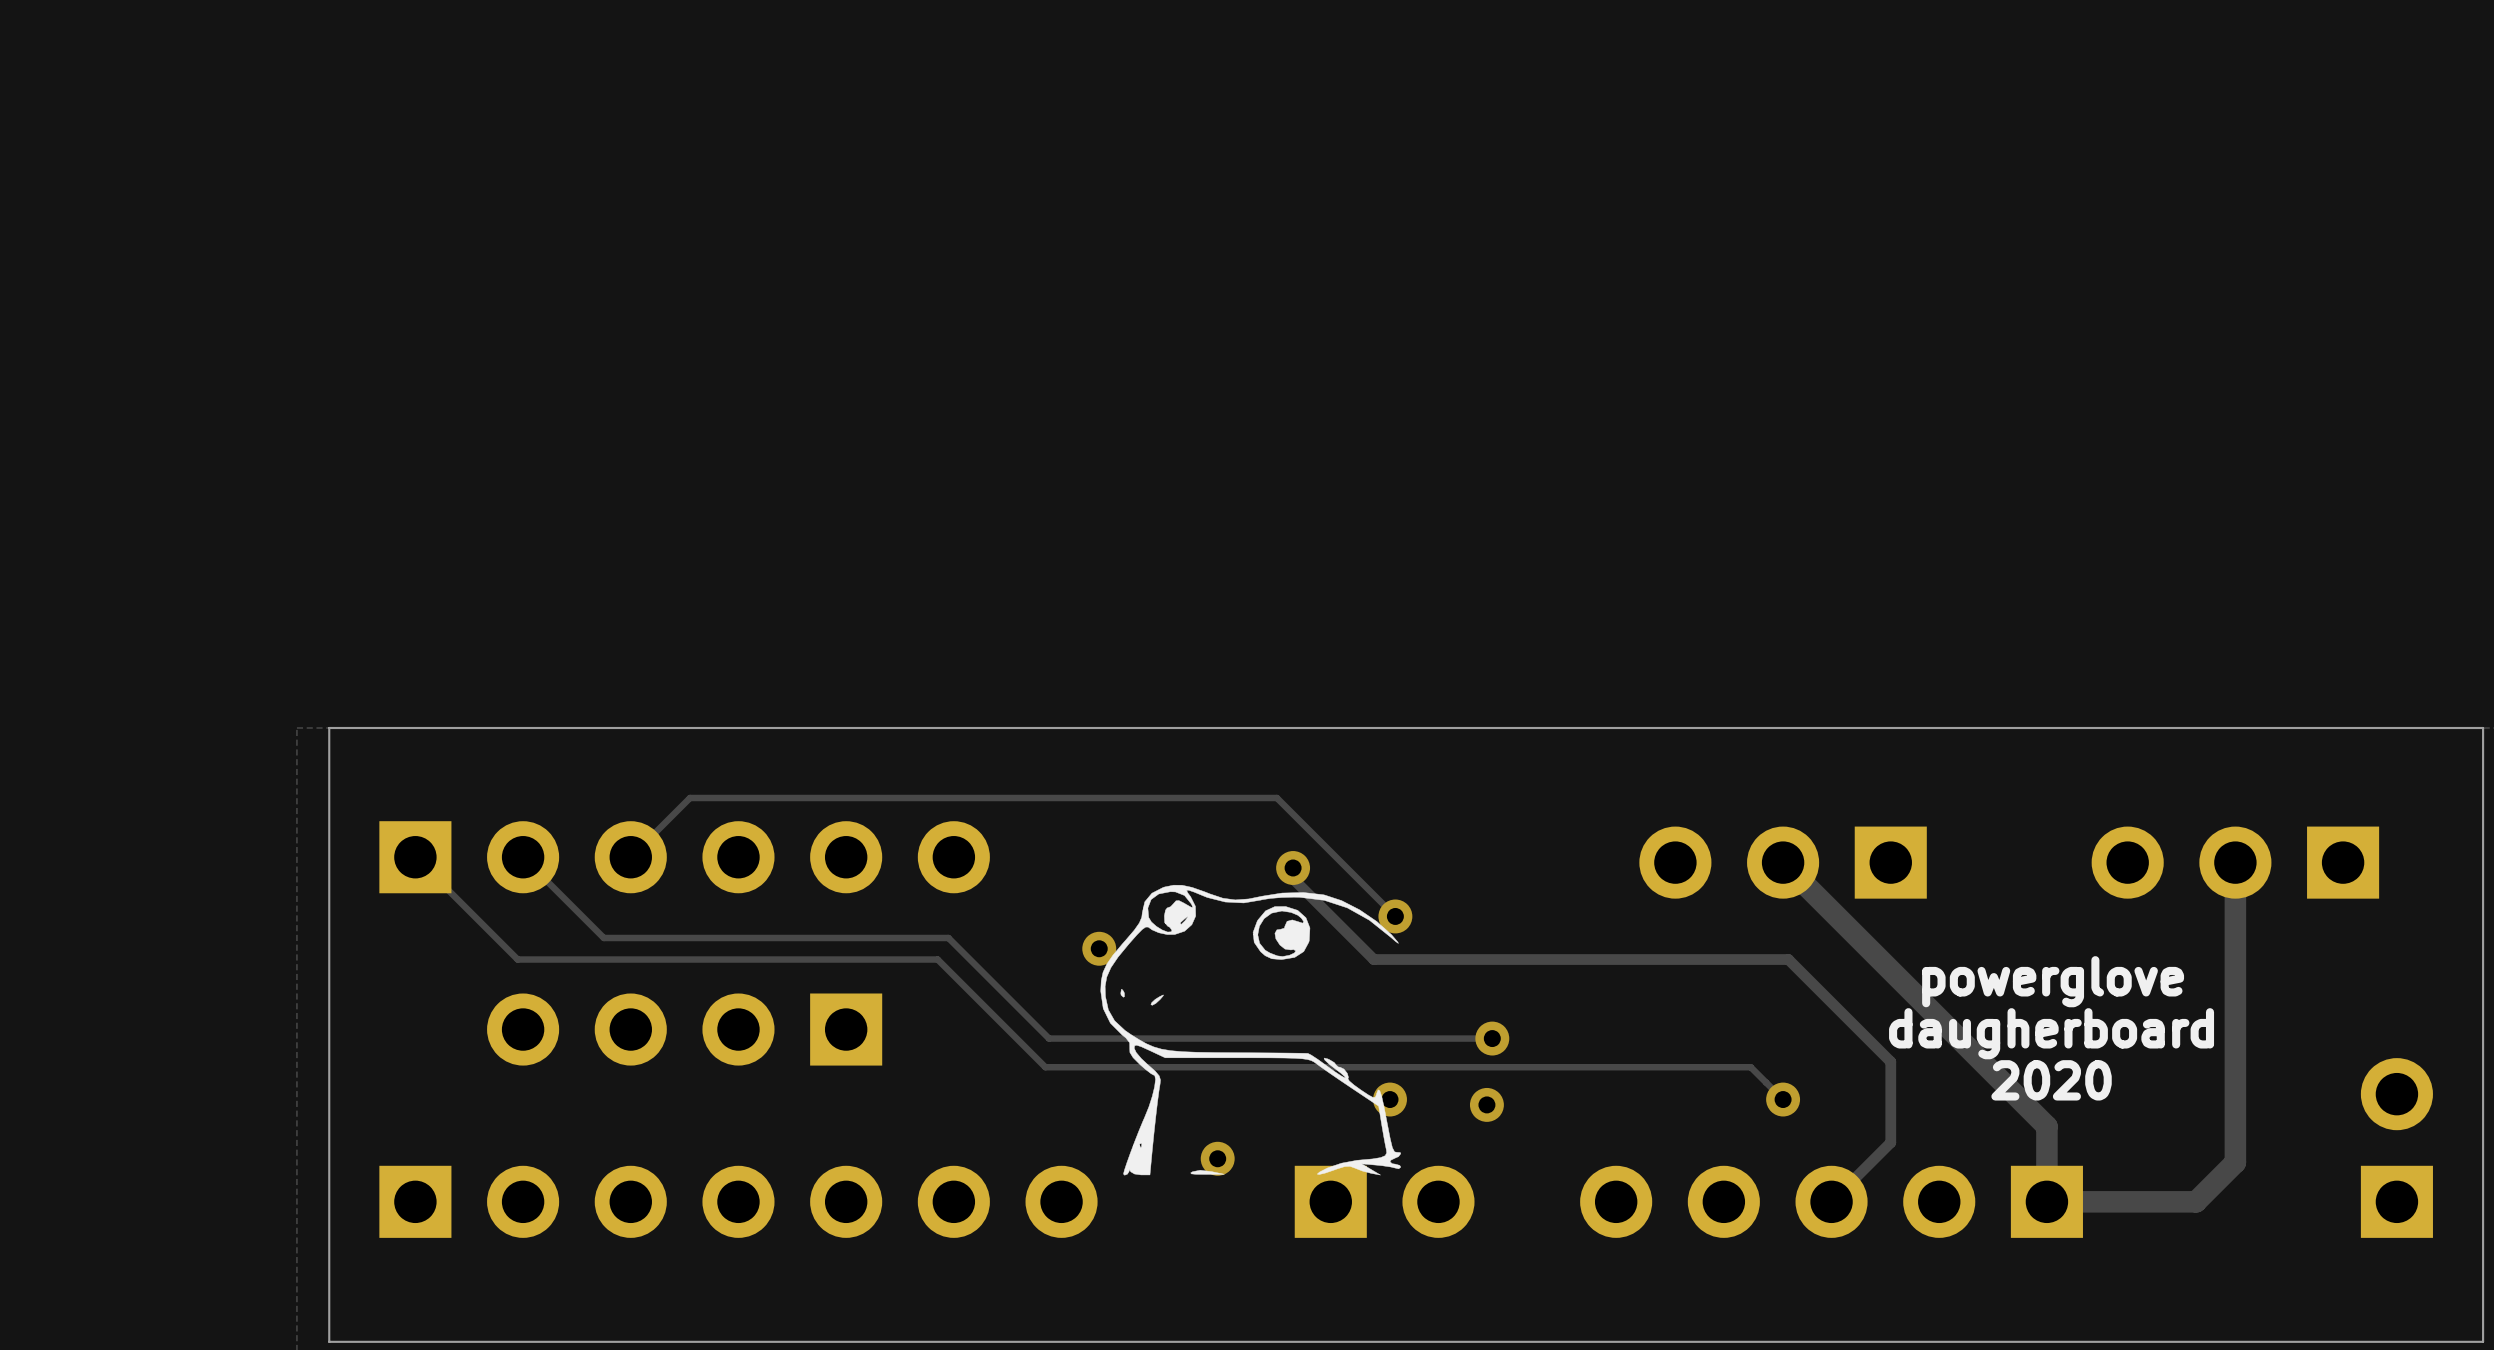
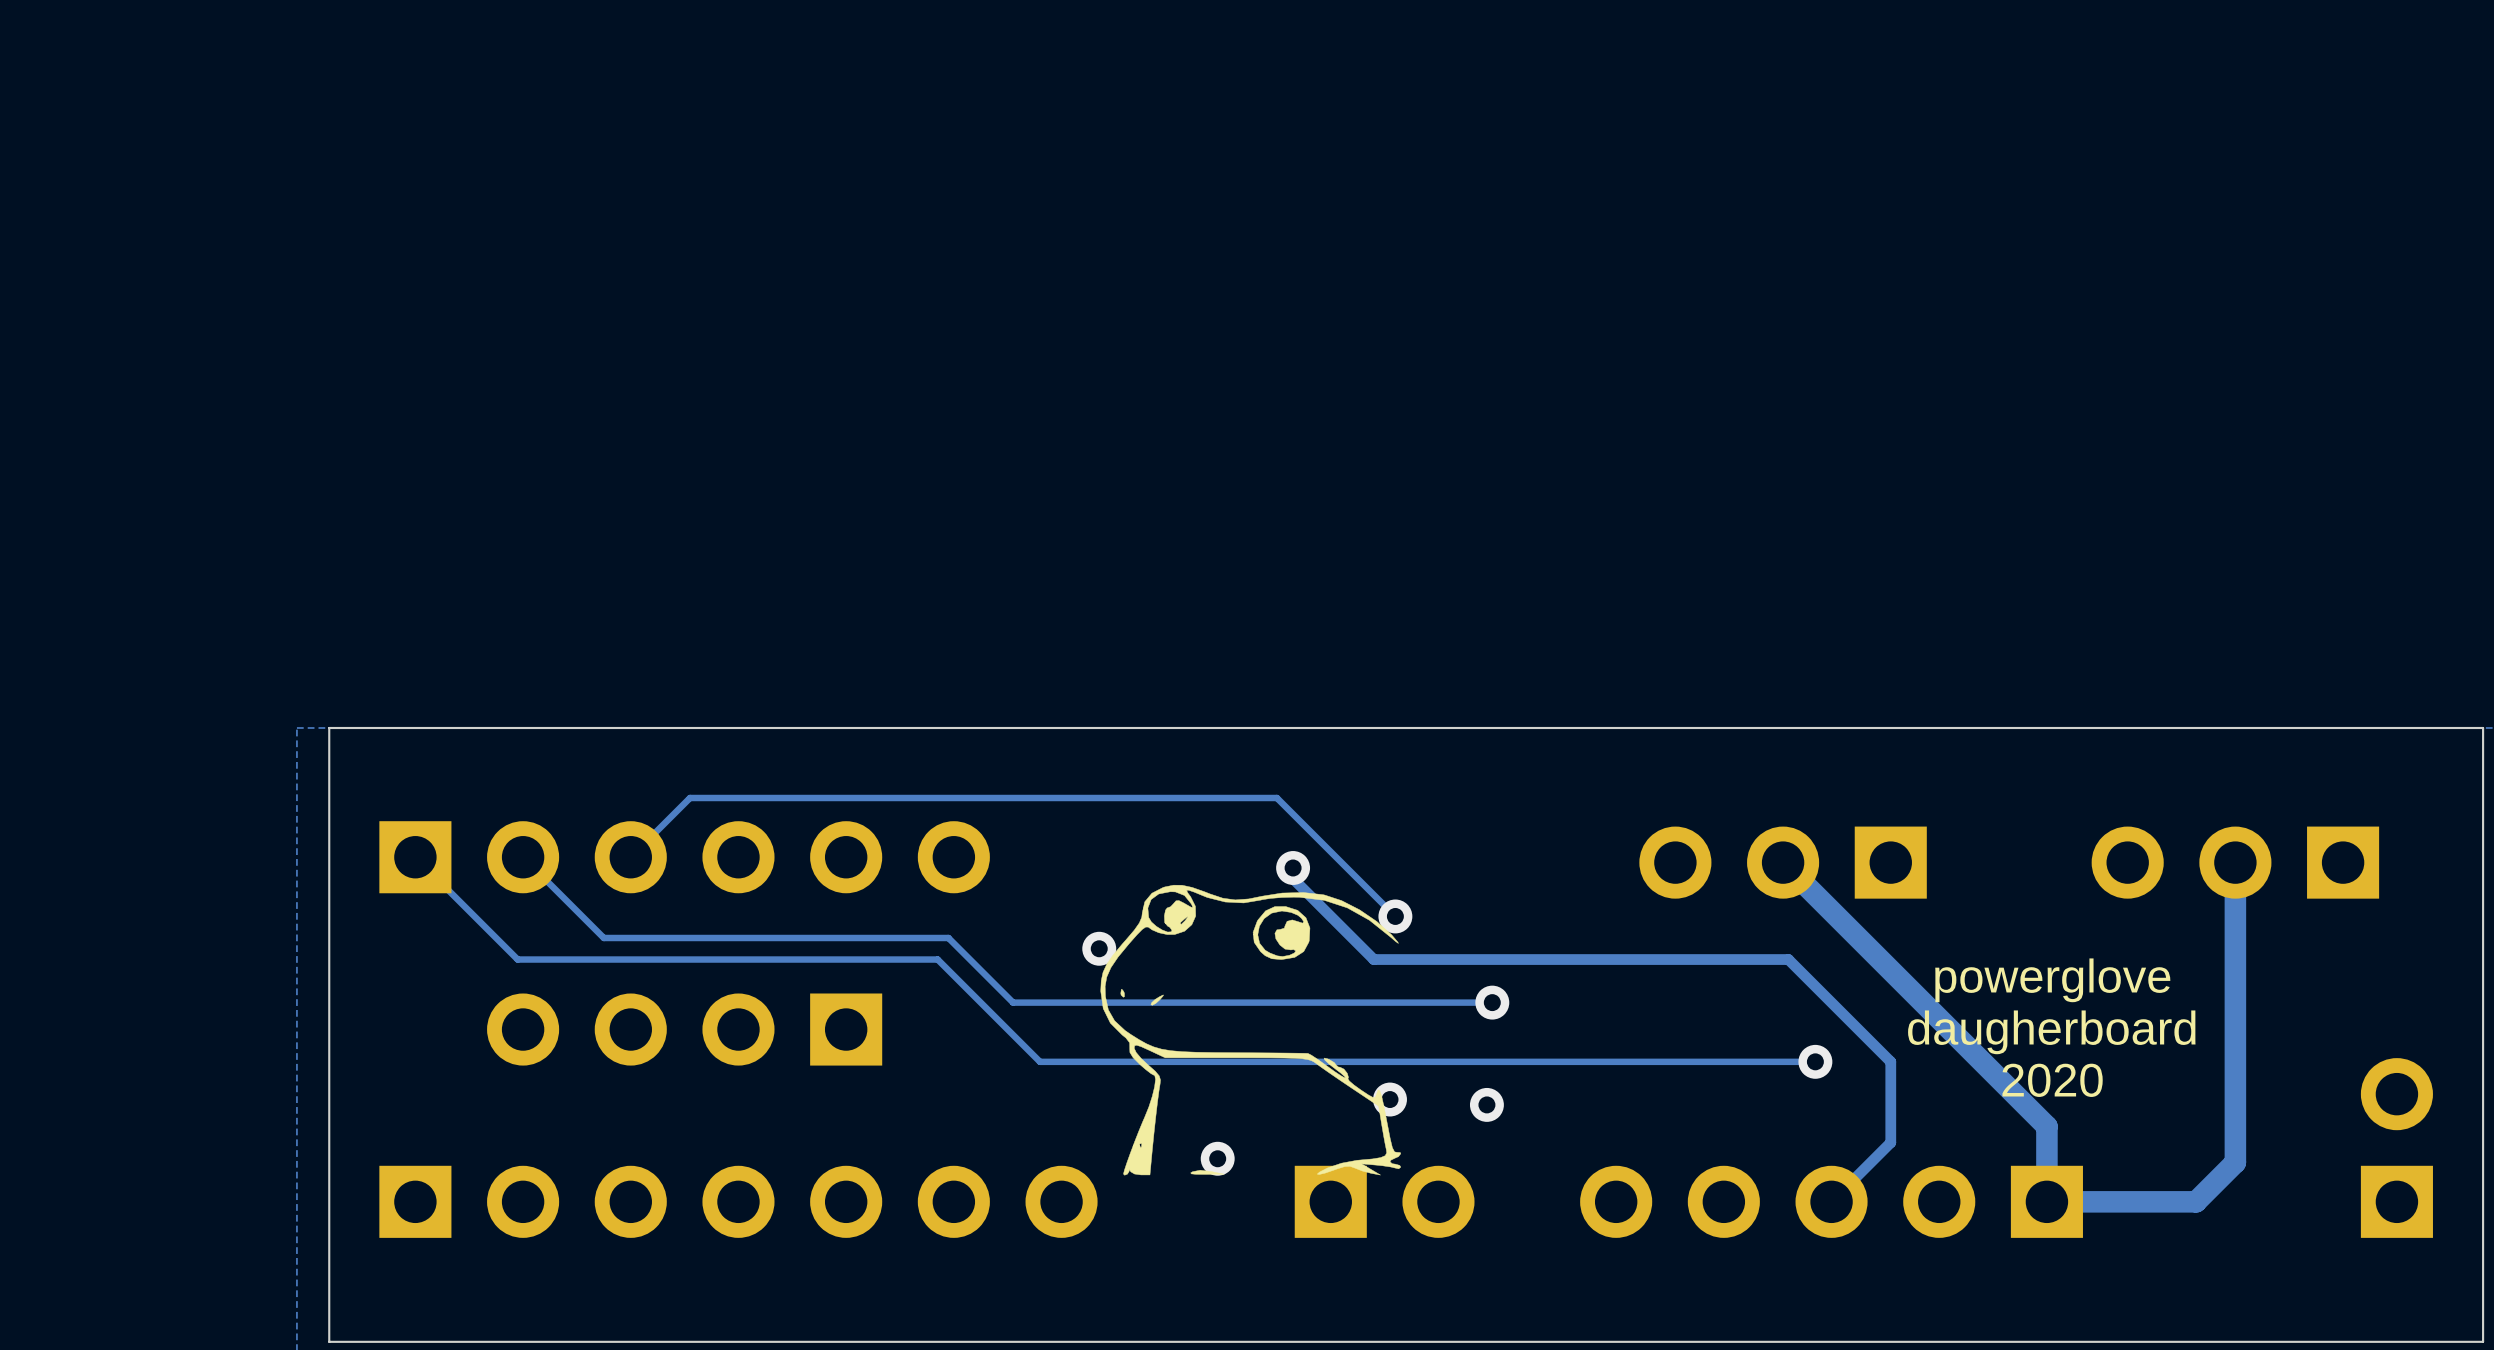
track: (1013, 1002) (1049, 1038) (1492, 1038) -> (1013, 1002) (1492, 1002)
via position: (1492, 1038) -> (1492, 1002)
track: (1040, 1061) (1045, 1067) (1750, 1067) (1783, 1099) -> (1040, 1061) (1815, 1061)
via position: (1783, 1099) -> (1815, 1061)

